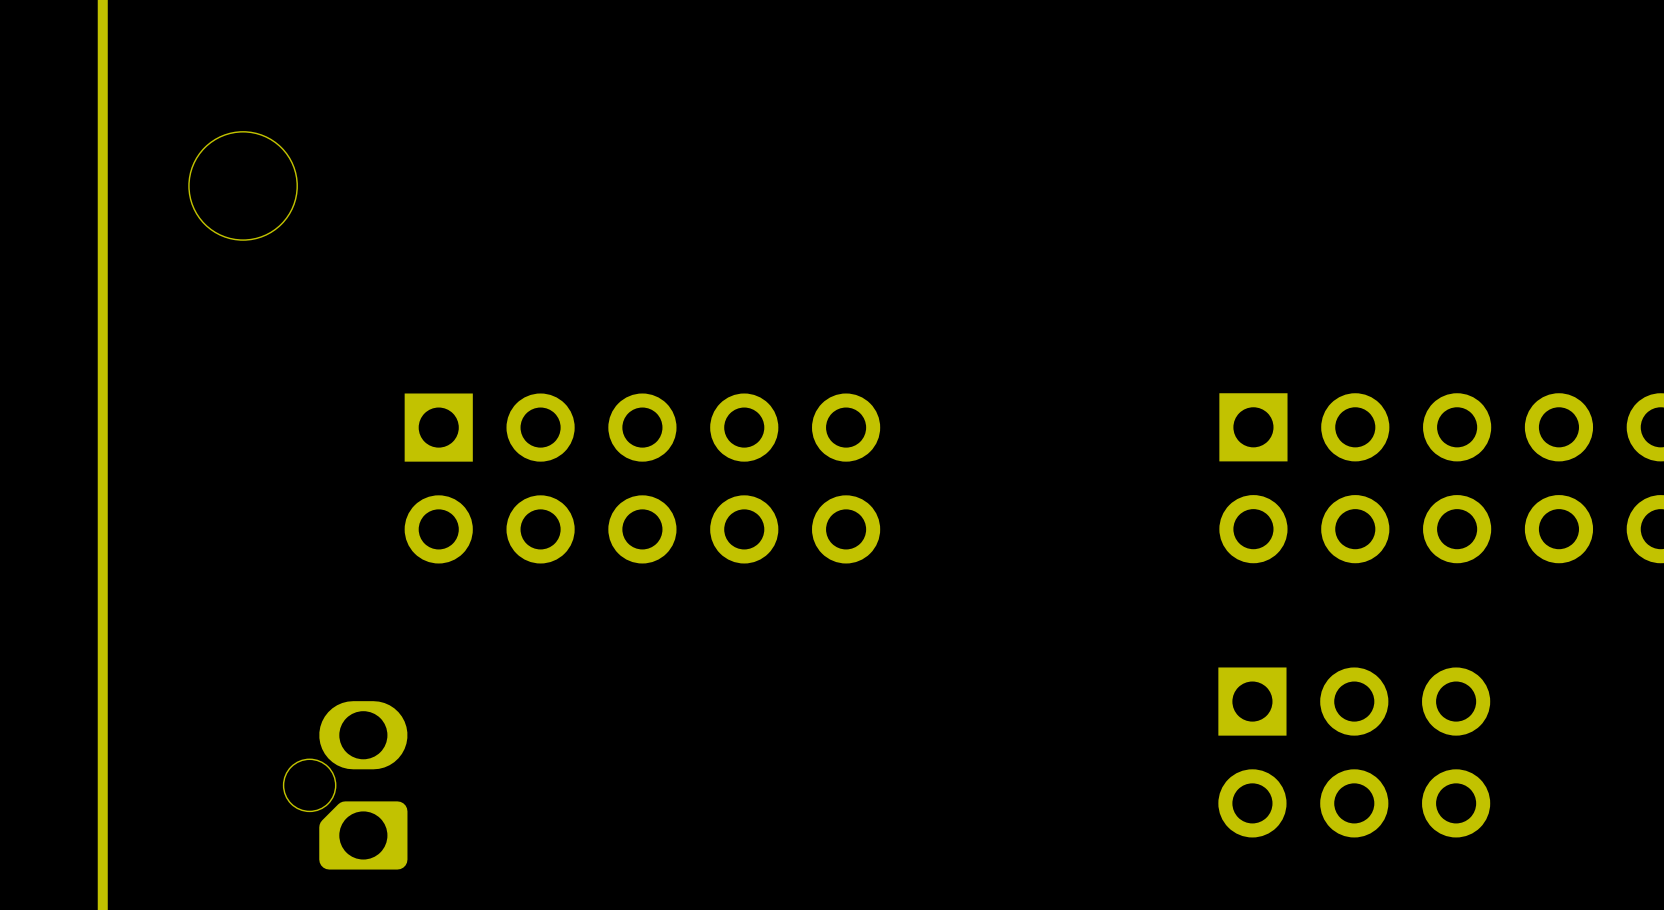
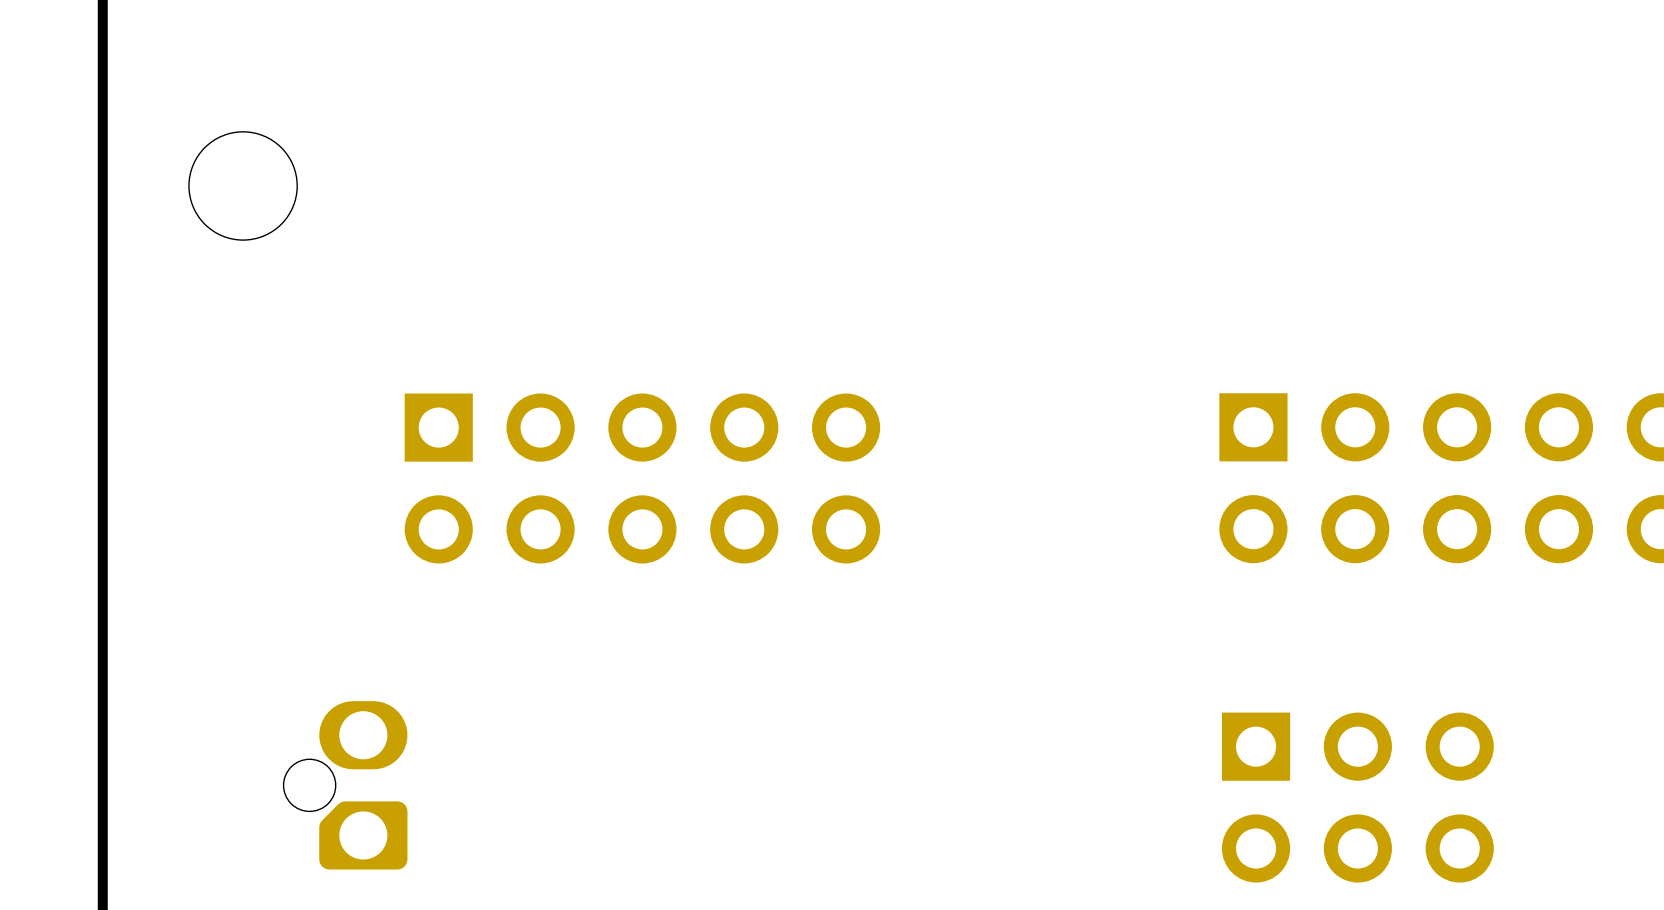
part position: (1354, 752) -> (1357, 797)

